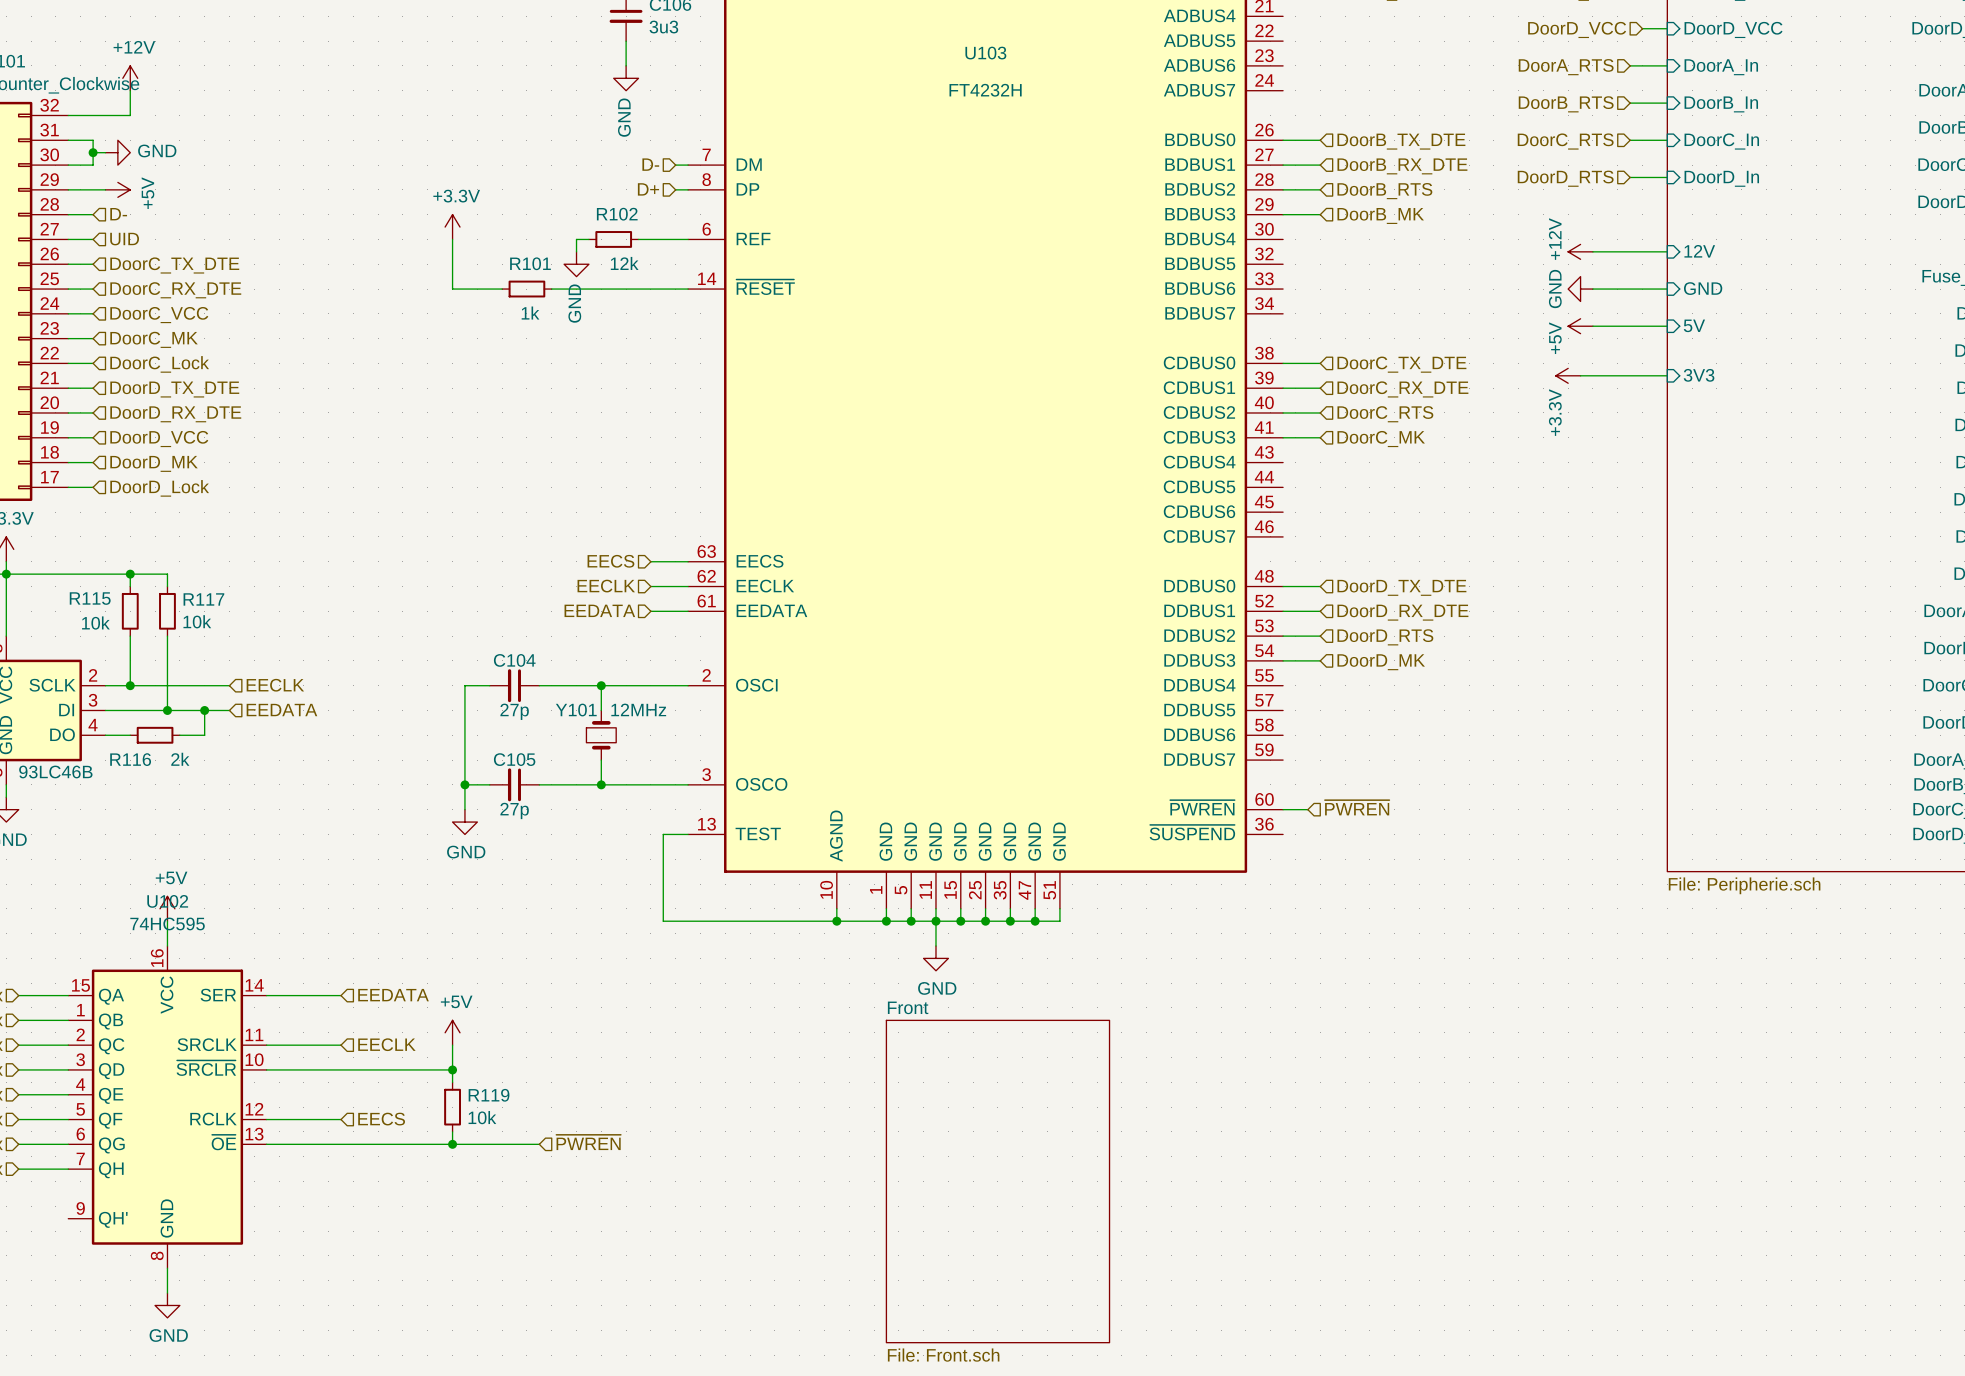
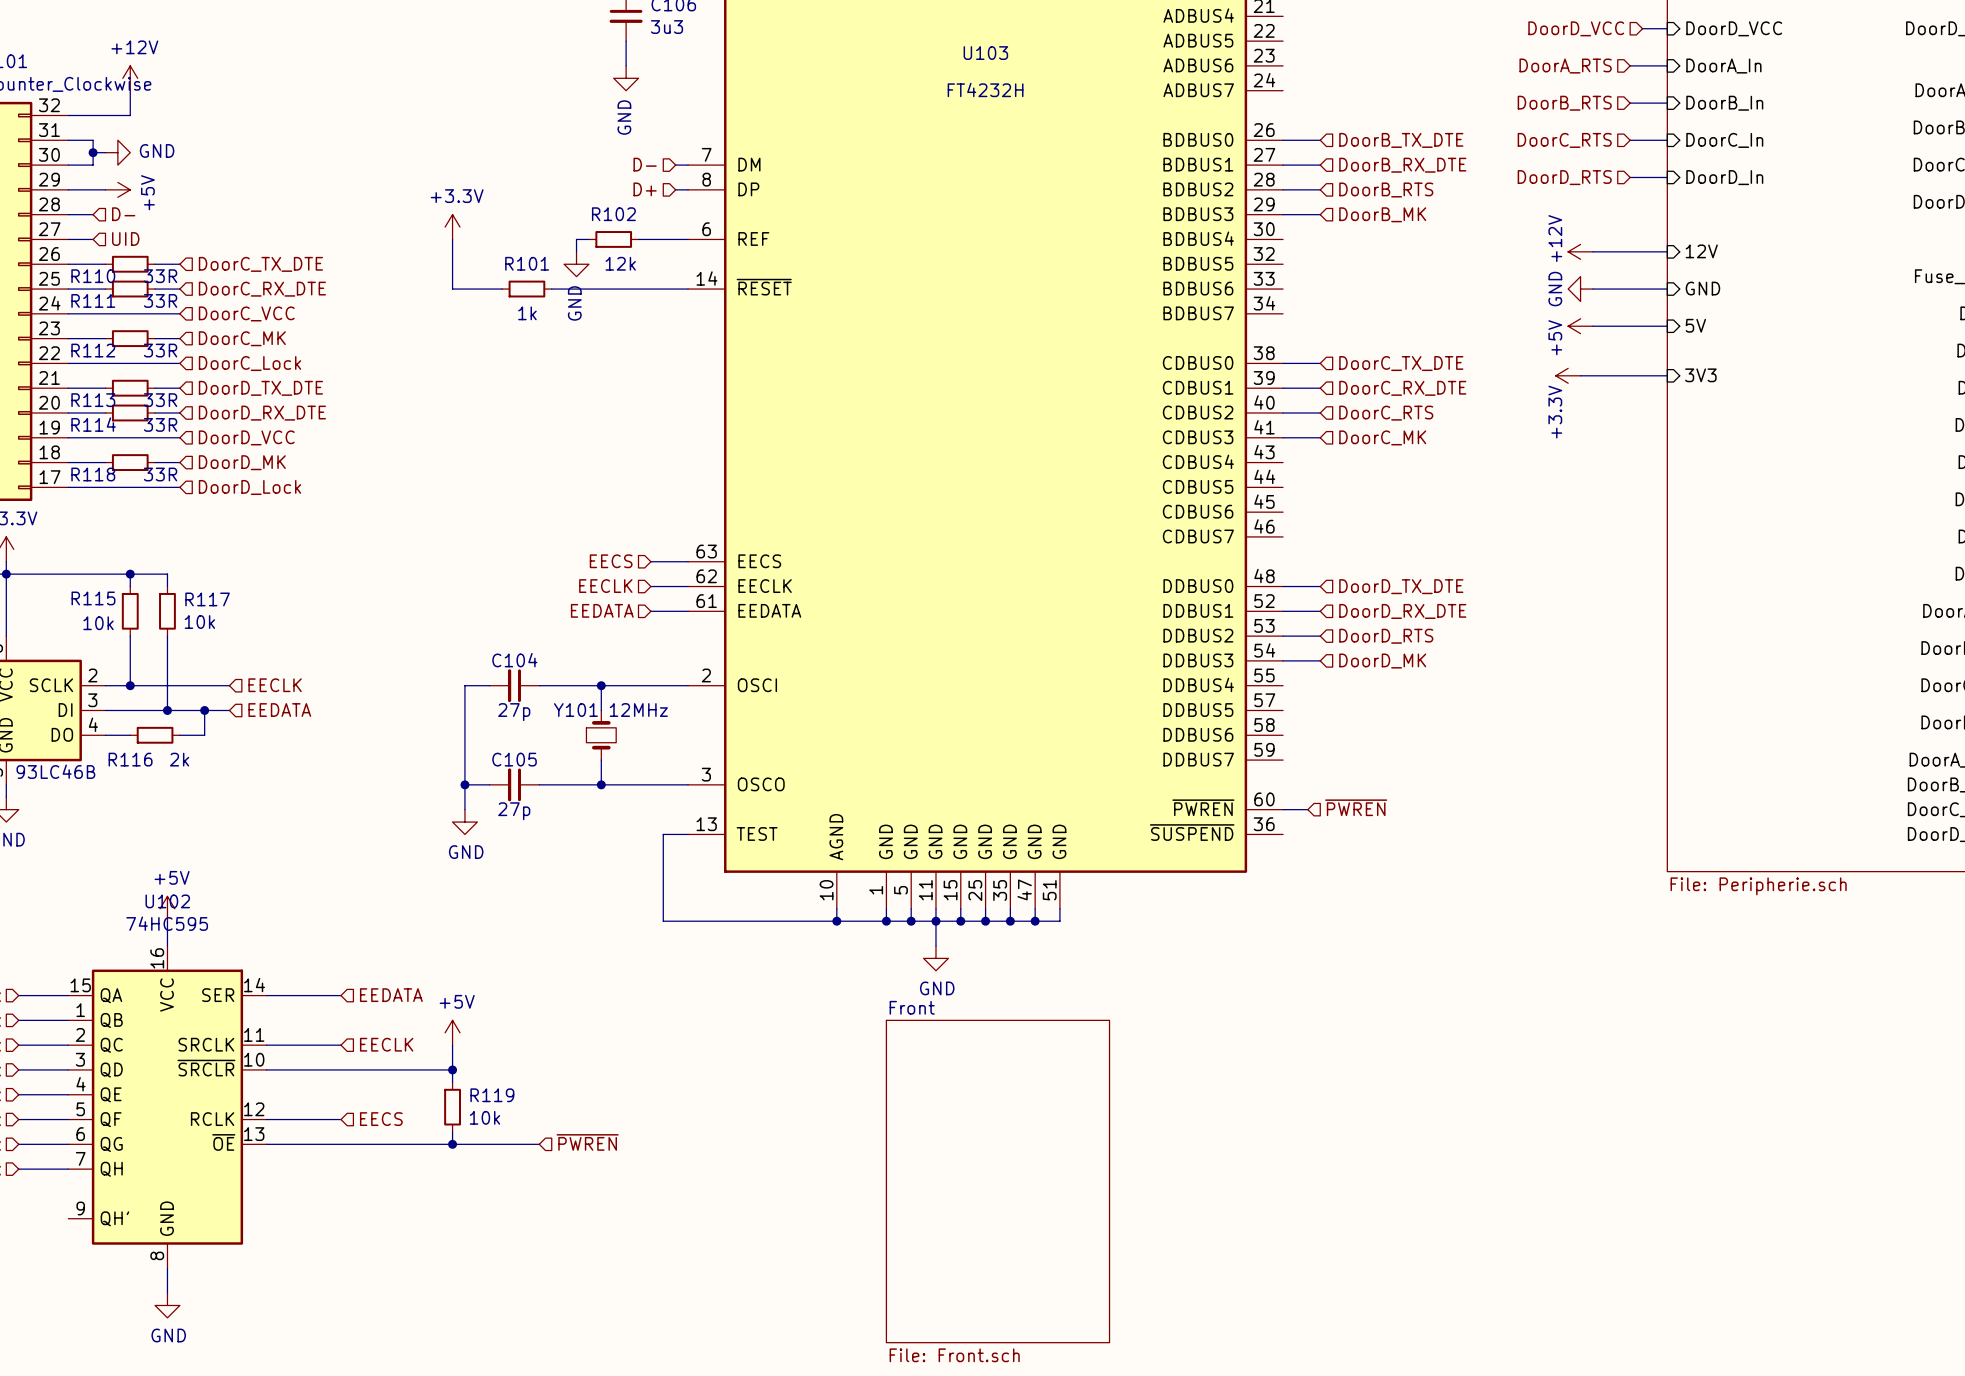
wire: none -> (93, 264) (105, 264)
R110: none -> 33R (130, 264)
wire: none -> (155, 264) (179, 264)
hierarchical label position: DoorC_TX_DTE (174, 265) -> DoorC_TX_DTE (260, 264)
wire: none -> (93, 289) (105, 289)
R111: none -> 33R (130, 289)
wire: none -> (155, 289) (179, 289)
hierarchical label position: DoorC_RX_DTE (175, 290) -> DoorC_RX_DTE (262, 289)
wire: none -> (93, 313) (179, 313)
hierarchical label position: DoorC_VCC (159, 315) -> DoorC_VCC (246, 313)
wire: none -> (93, 338) (105, 338)
R112: none -> 33R (130, 338)
wire: none -> (155, 338) (179, 338)
hierarchical label position: DoorC_MK (154, 339) -> DoorC_MK (242, 338)
wire: none -> (93, 363) (179, 363)
hierarchical label position: DoorC_Lock (159, 364) -> DoorC_Lock (250, 363)
wire: none -> (93, 388) (105, 388)
R113: none -> 33R (130, 388)
wire: none -> (155, 388) (179, 388)
hierarchical label position: DoorD_TX_DTE (174, 389) -> DoorD_TX_DTE (260, 388)
wire: none -> (93, 412) (105, 412)
R114: none -> 33R (130, 412)
wire: none -> (155, 412) (179, 412)
hierarchical label position: DoorD_RX_DTE (175, 414) -> DoorD_RX_DTE (262, 413)
wire: none -> (93, 437) (179, 437)
hierarchical label position: DoorD_VCC (159, 439) -> DoorD_VCC (246, 437)
wire: none -> (93, 462) (105, 462)
R118: none -> 33R (130, 462)
wire: none -> (155, 462) (179, 462)
hierarchical label position: DoorD_MK (154, 463) -> DoorD_MK (242, 462)
wire: none -> (93, 487) (179, 487)
hierarchical label position: DoorD_Lock (159, 488) -> DoorD_Lock (250, 487)

